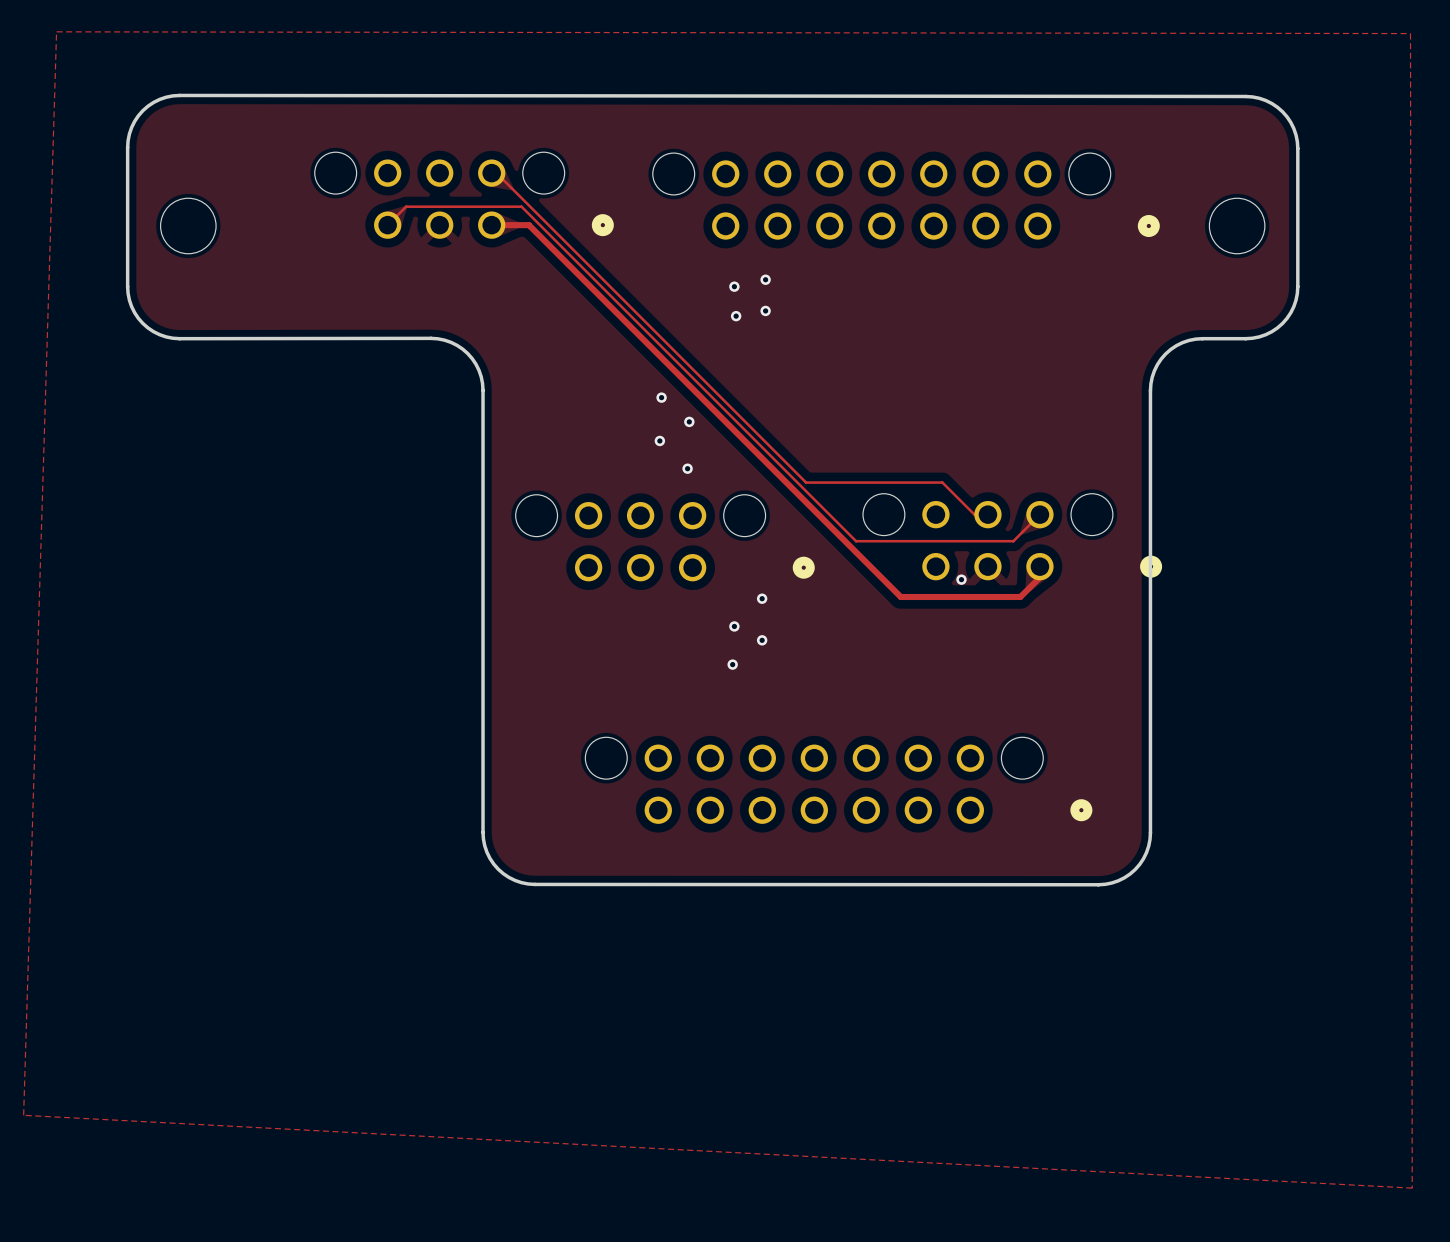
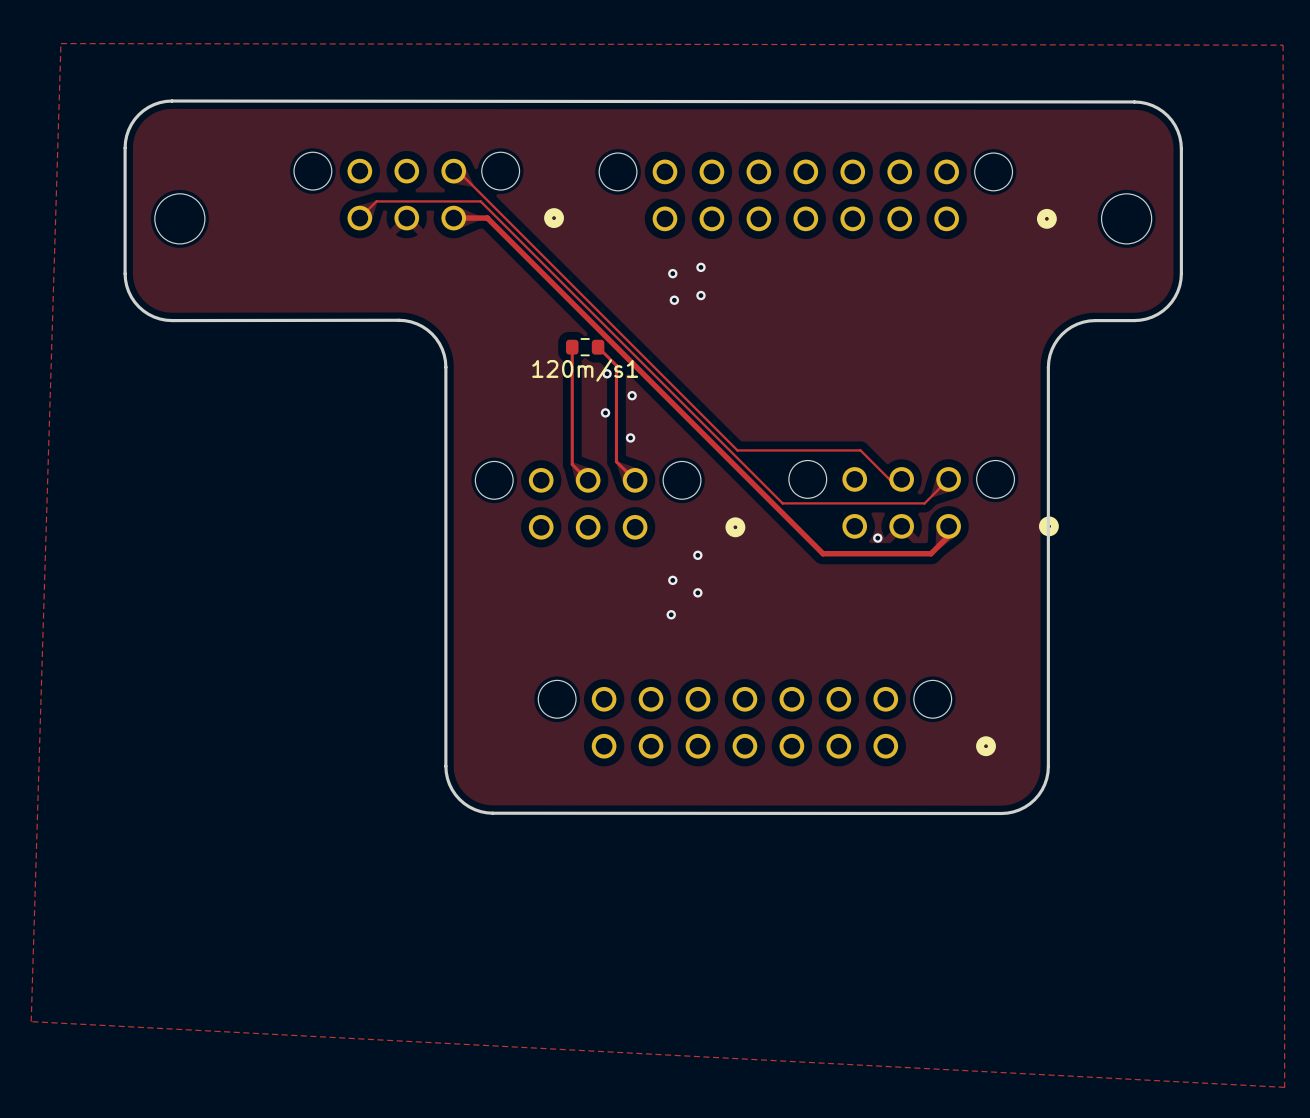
track: none -> (572, 347) (572, 464) (588, 480)
120m/s1: none -> (585, 347)
track: none -> (598, 347) (616, 365) (616, 461) (635, 480)

